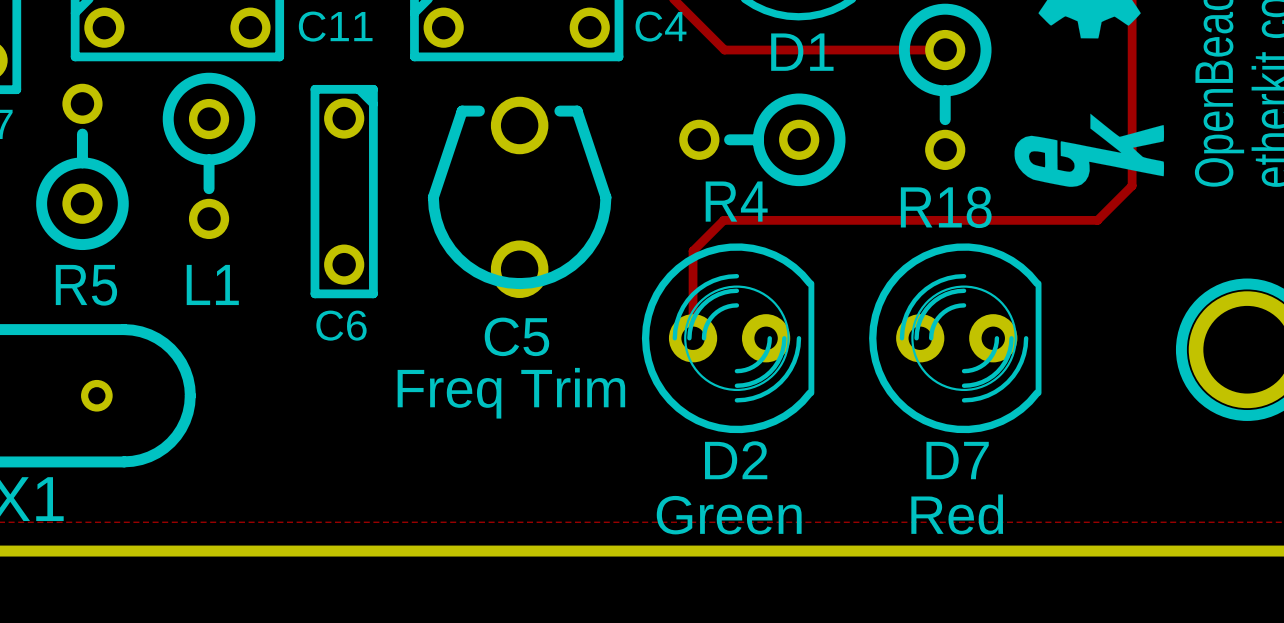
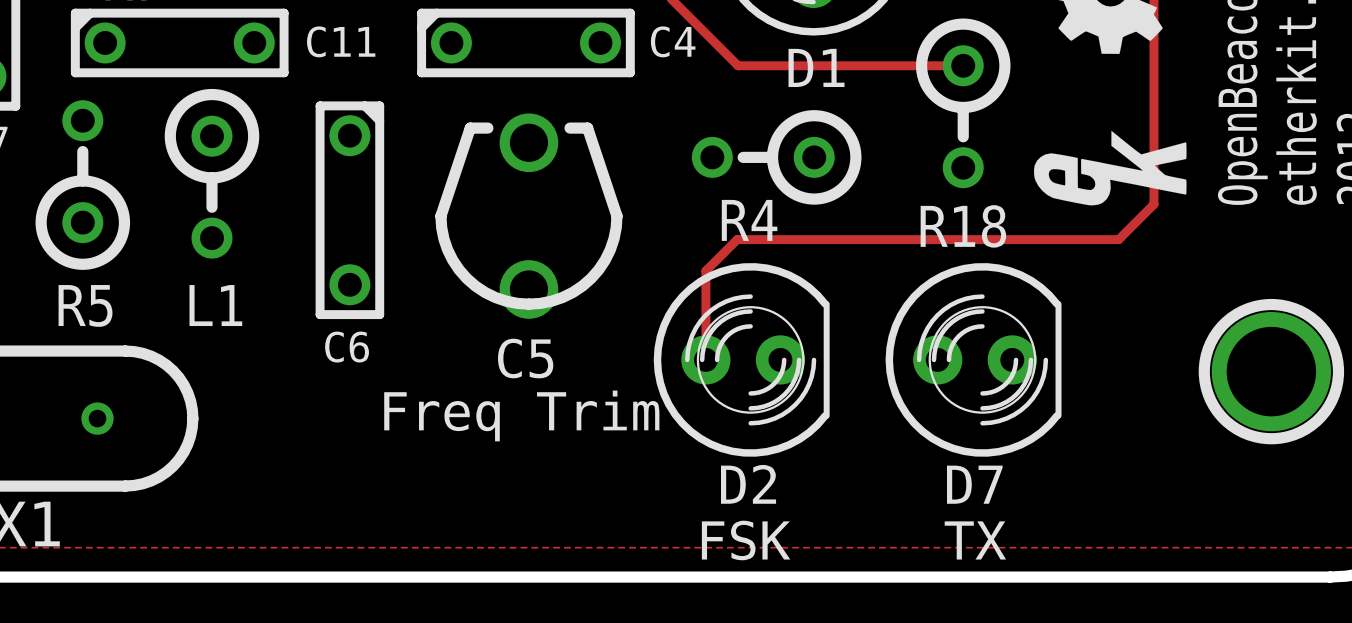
D7 value: Red (957, 514) -> TX (975, 540)
D2 value: Green (729, 515) -> FSK (746, 540)

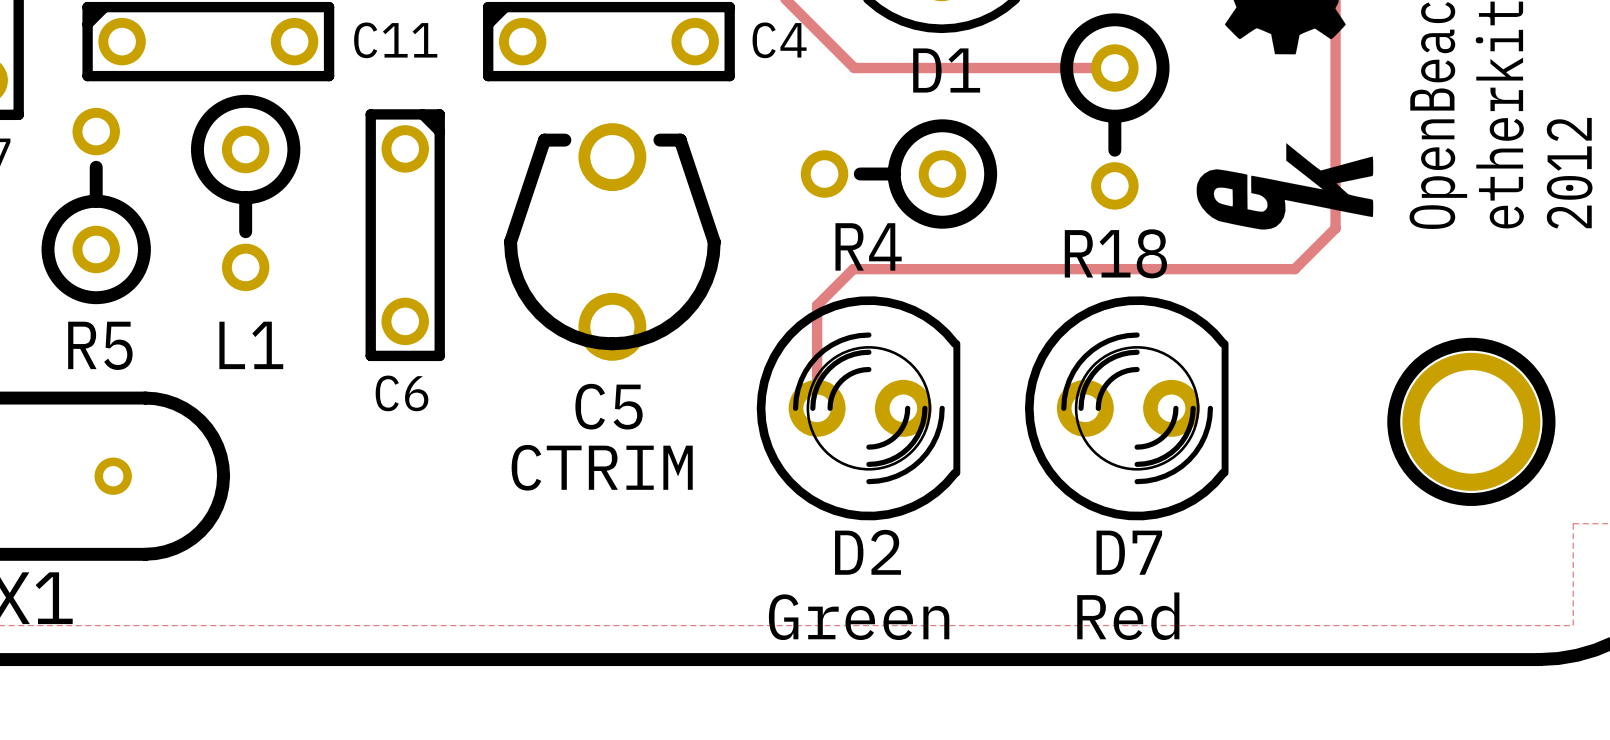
C5 value: Freq Trim (521, 415) -> CTRIM (602, 467)
D2 value: FSK (746, 540) -> Green (859, 617)
D7 value: TX (975, 540) -> Red (1128, 616)

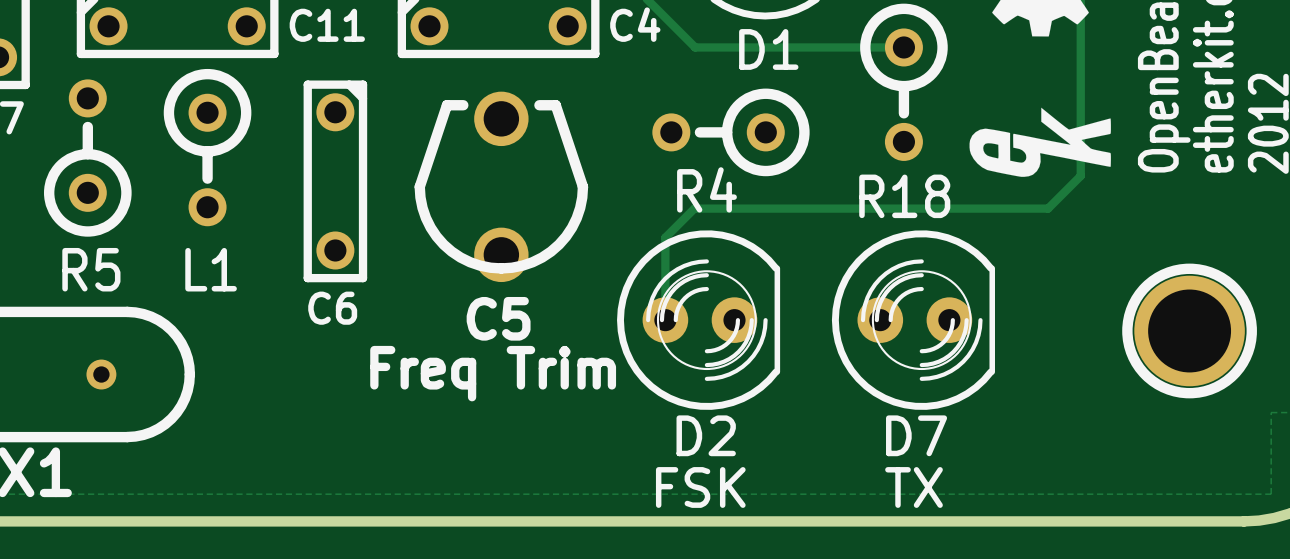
C5 value: CTRIM (602, 467) -> Freq Trim (493, 373)
D7 value: Red (1128, 616) -> TX (914, 487)
D2 value: Green (859, 617) -> FSK (700, 487)

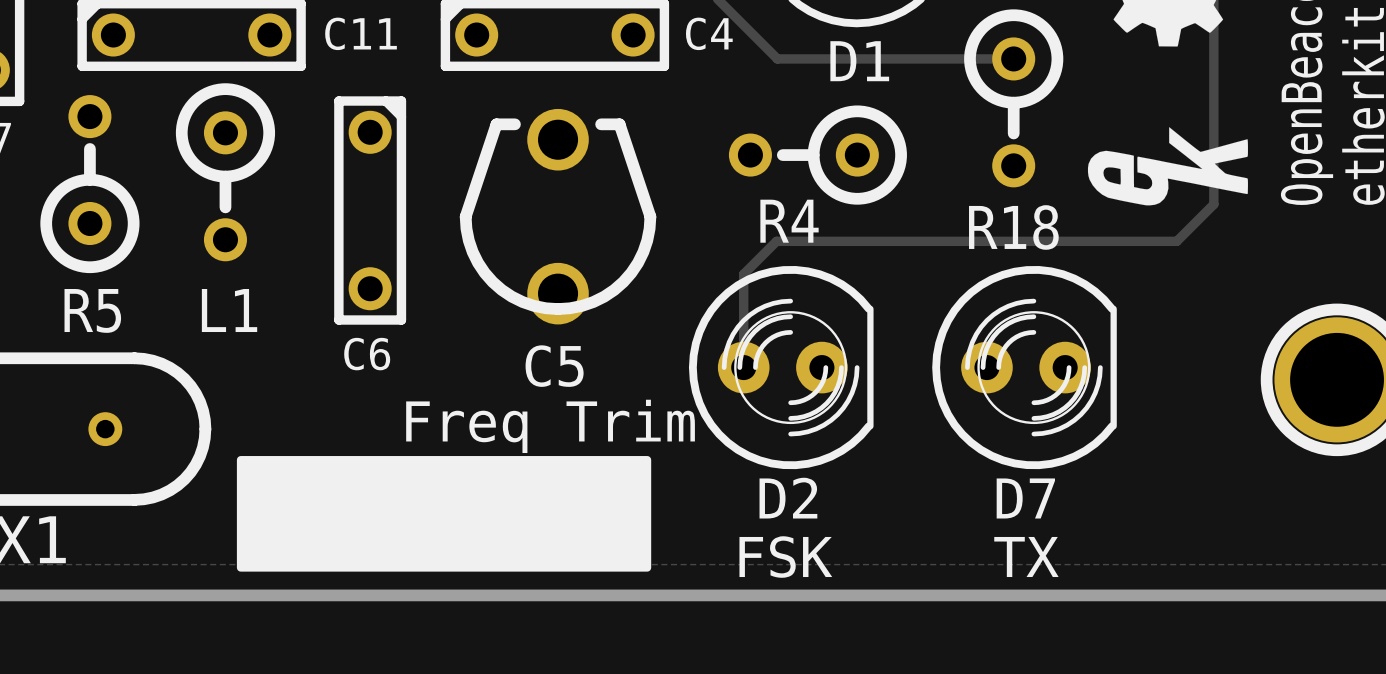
drawing: none -> [236, 456, 652, 572]

